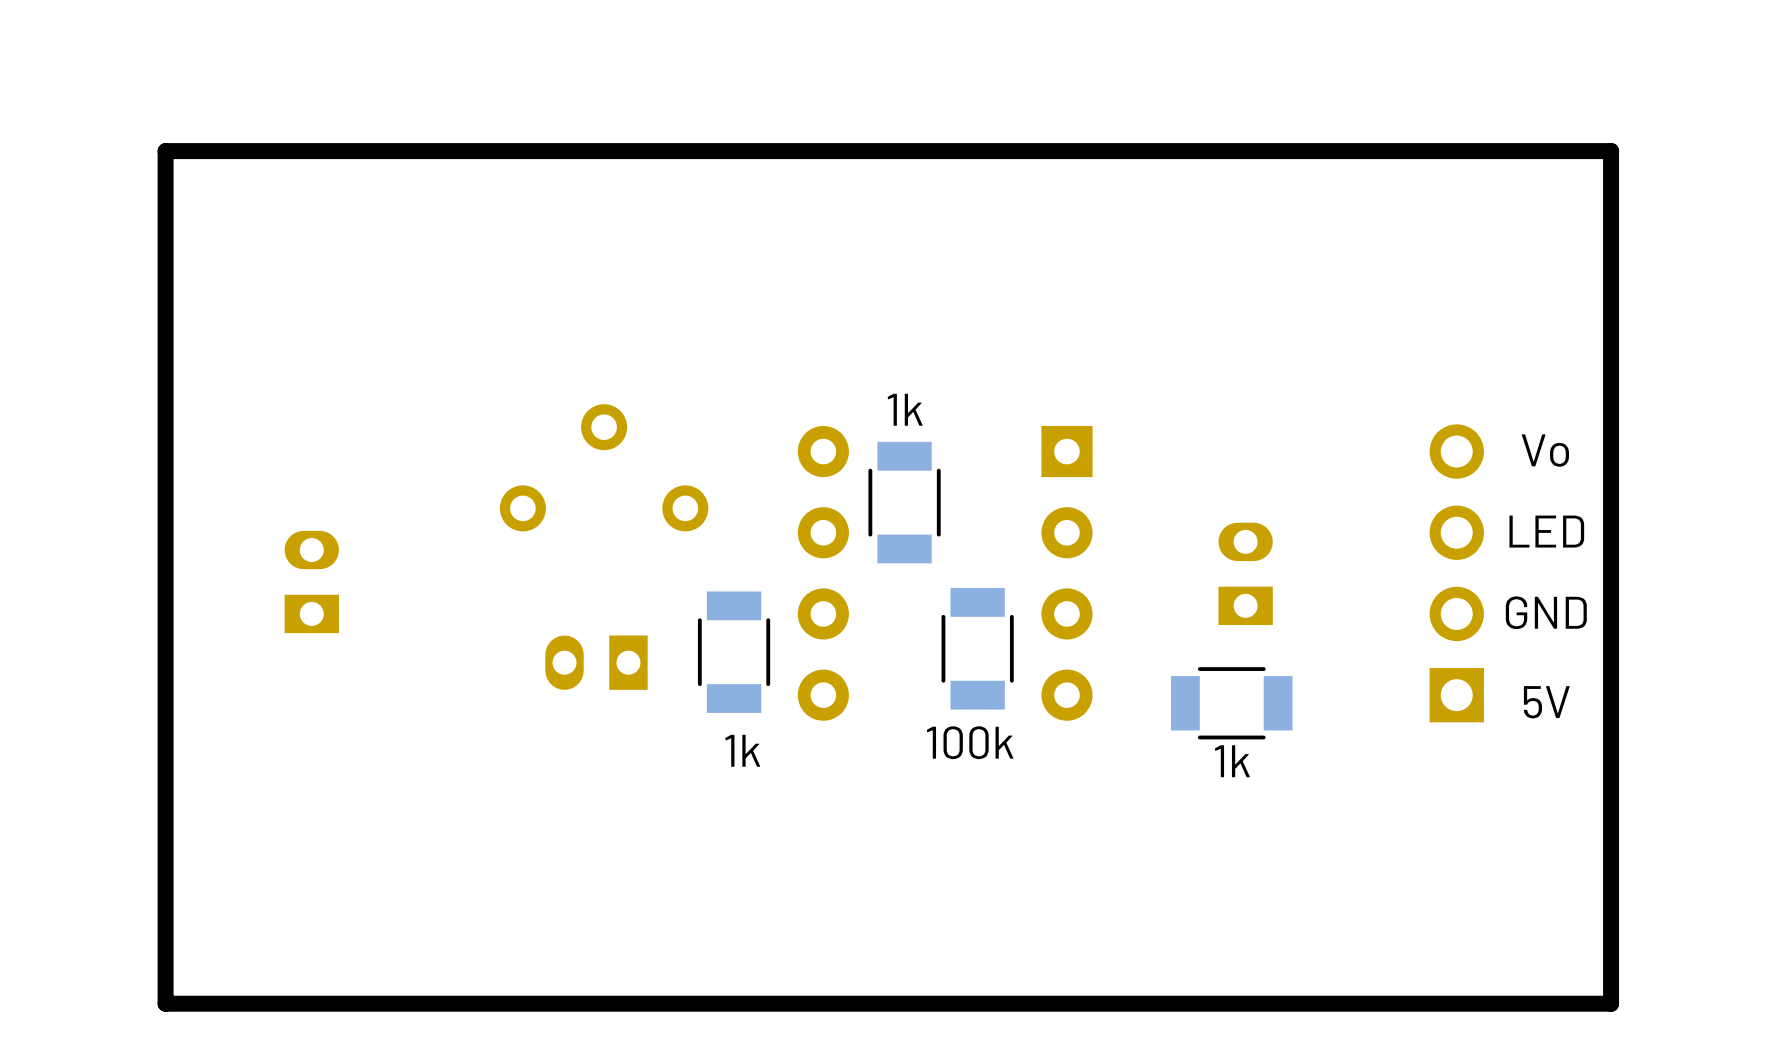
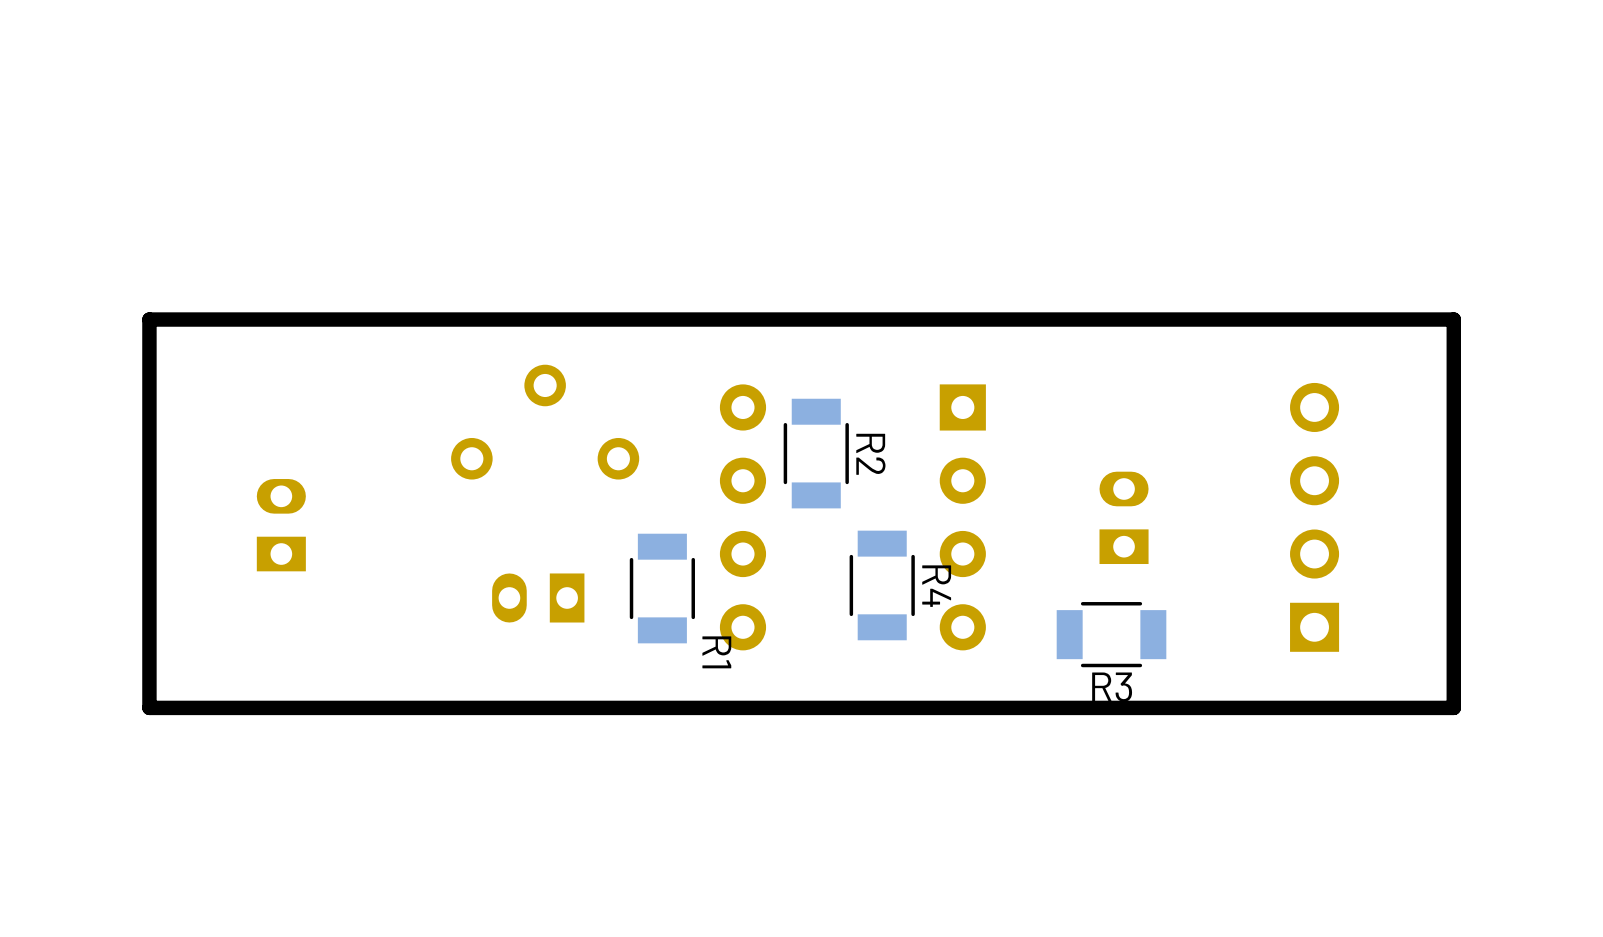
board edge: (1611, 354) (1611, 151) (165, 151) (165, 354) -> (1453, 319) (149, 319)
1k name: 1k (905, 409) -> R2 (870, 454)
text: Vo (1545, 450) -> none
text: LED (1546, 531) -> none
text: GND (1546, 612) -> none
text: 5V (1546, 702) -> none
100k name: 100k (970, 742) -> R4 (936, 586)
1k name: 1k (742, 750) -> R1 (716, 652)
1k name: 1k (1232, 761) -> R3 (1112, 687)
board edge: (1611, 784) (1611, 1003) (165, 1003) (165, 784) -> (1453, 707) (149, 707)

